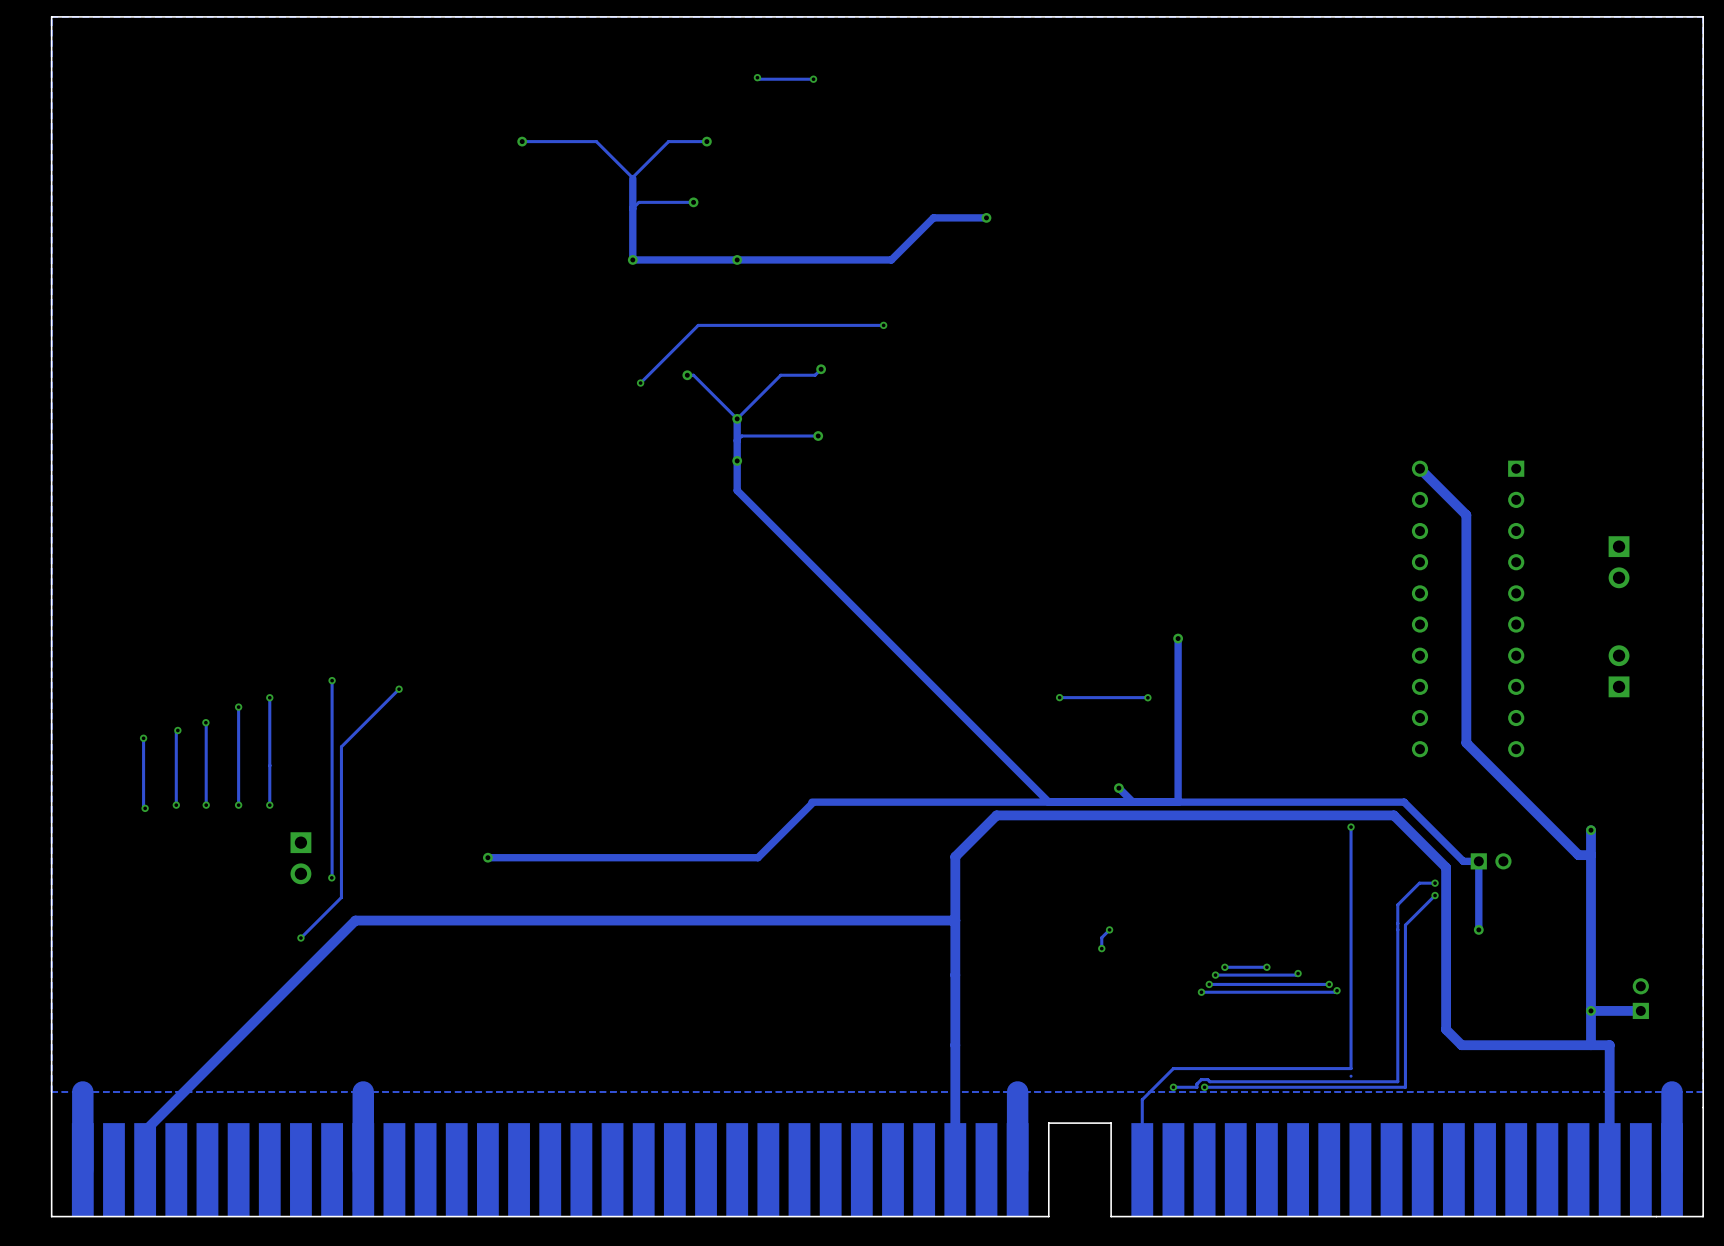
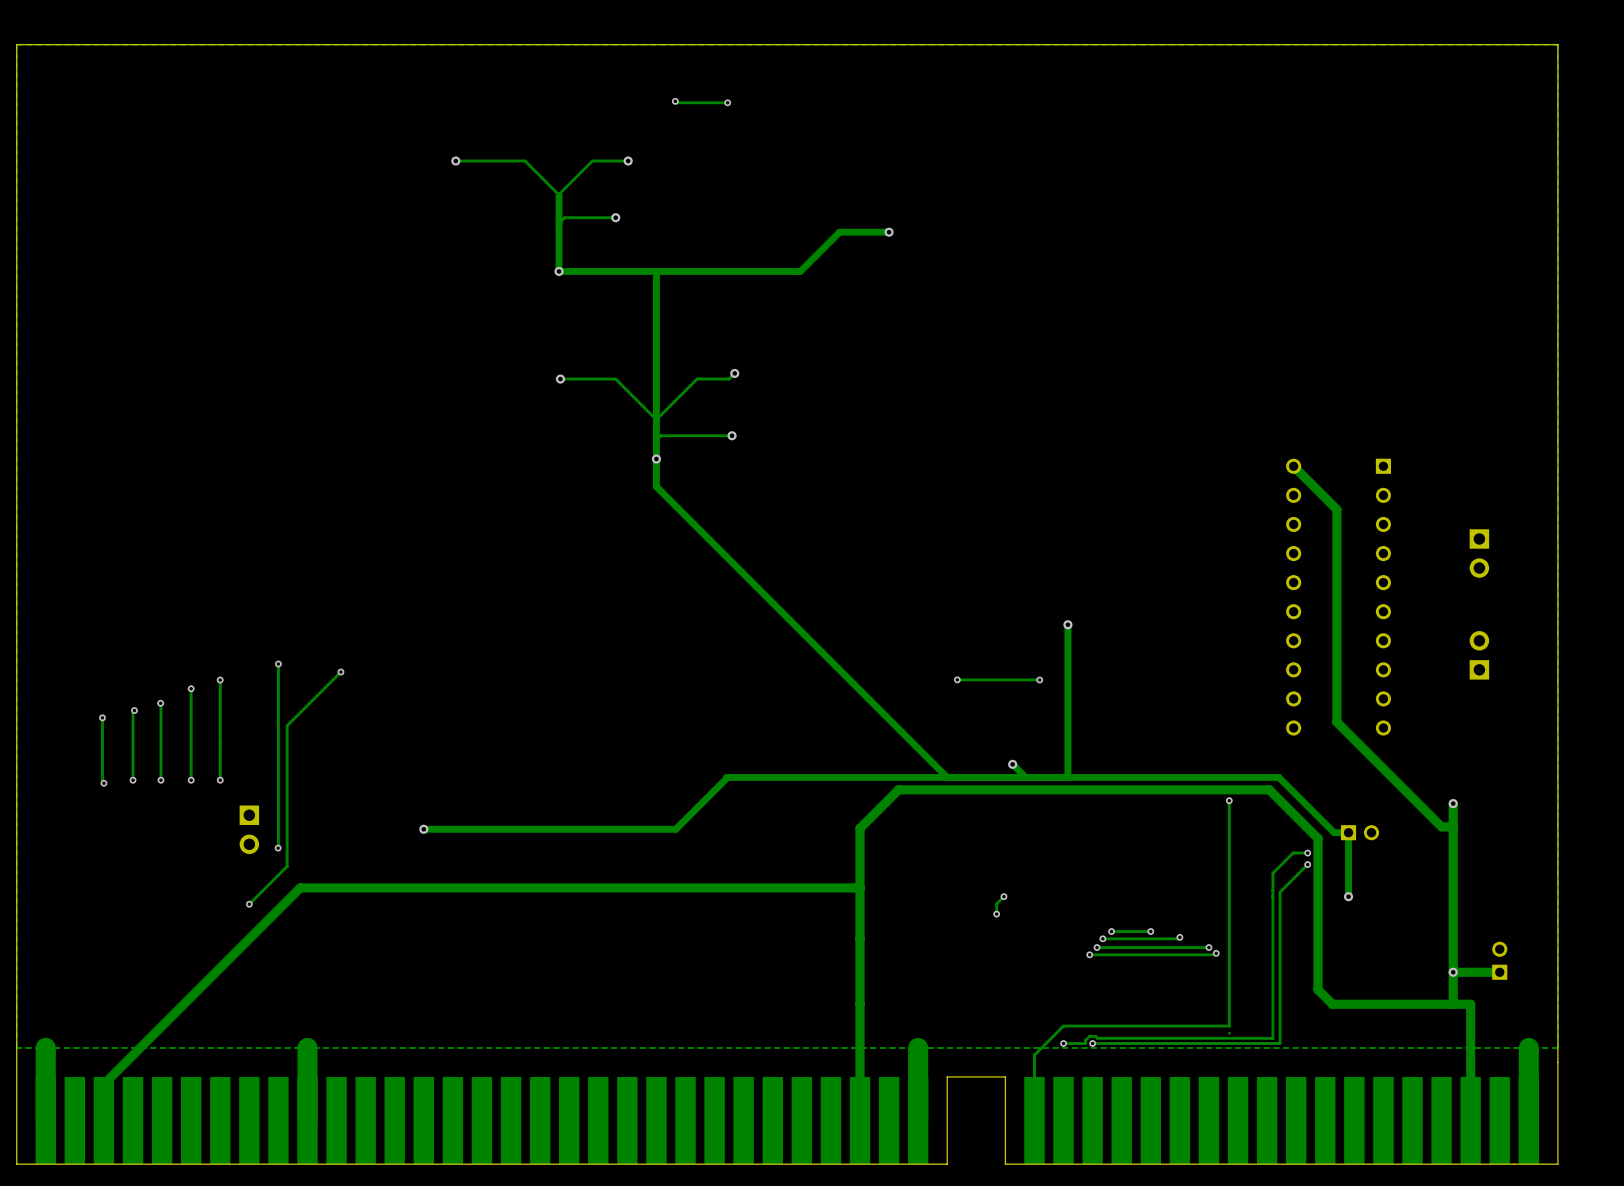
track: none -> (656, 271) (656, 419)
via: (737, 259) -> none
track: (883, 325) (698, 325) (640, 383) -> none
via: (883, 325) -> none
track: none -> (609, 379) (560, 379)
via position: (687, 375) -> (560, 379)
via: (640, 383) -> none
via: (737, 418) -> none

